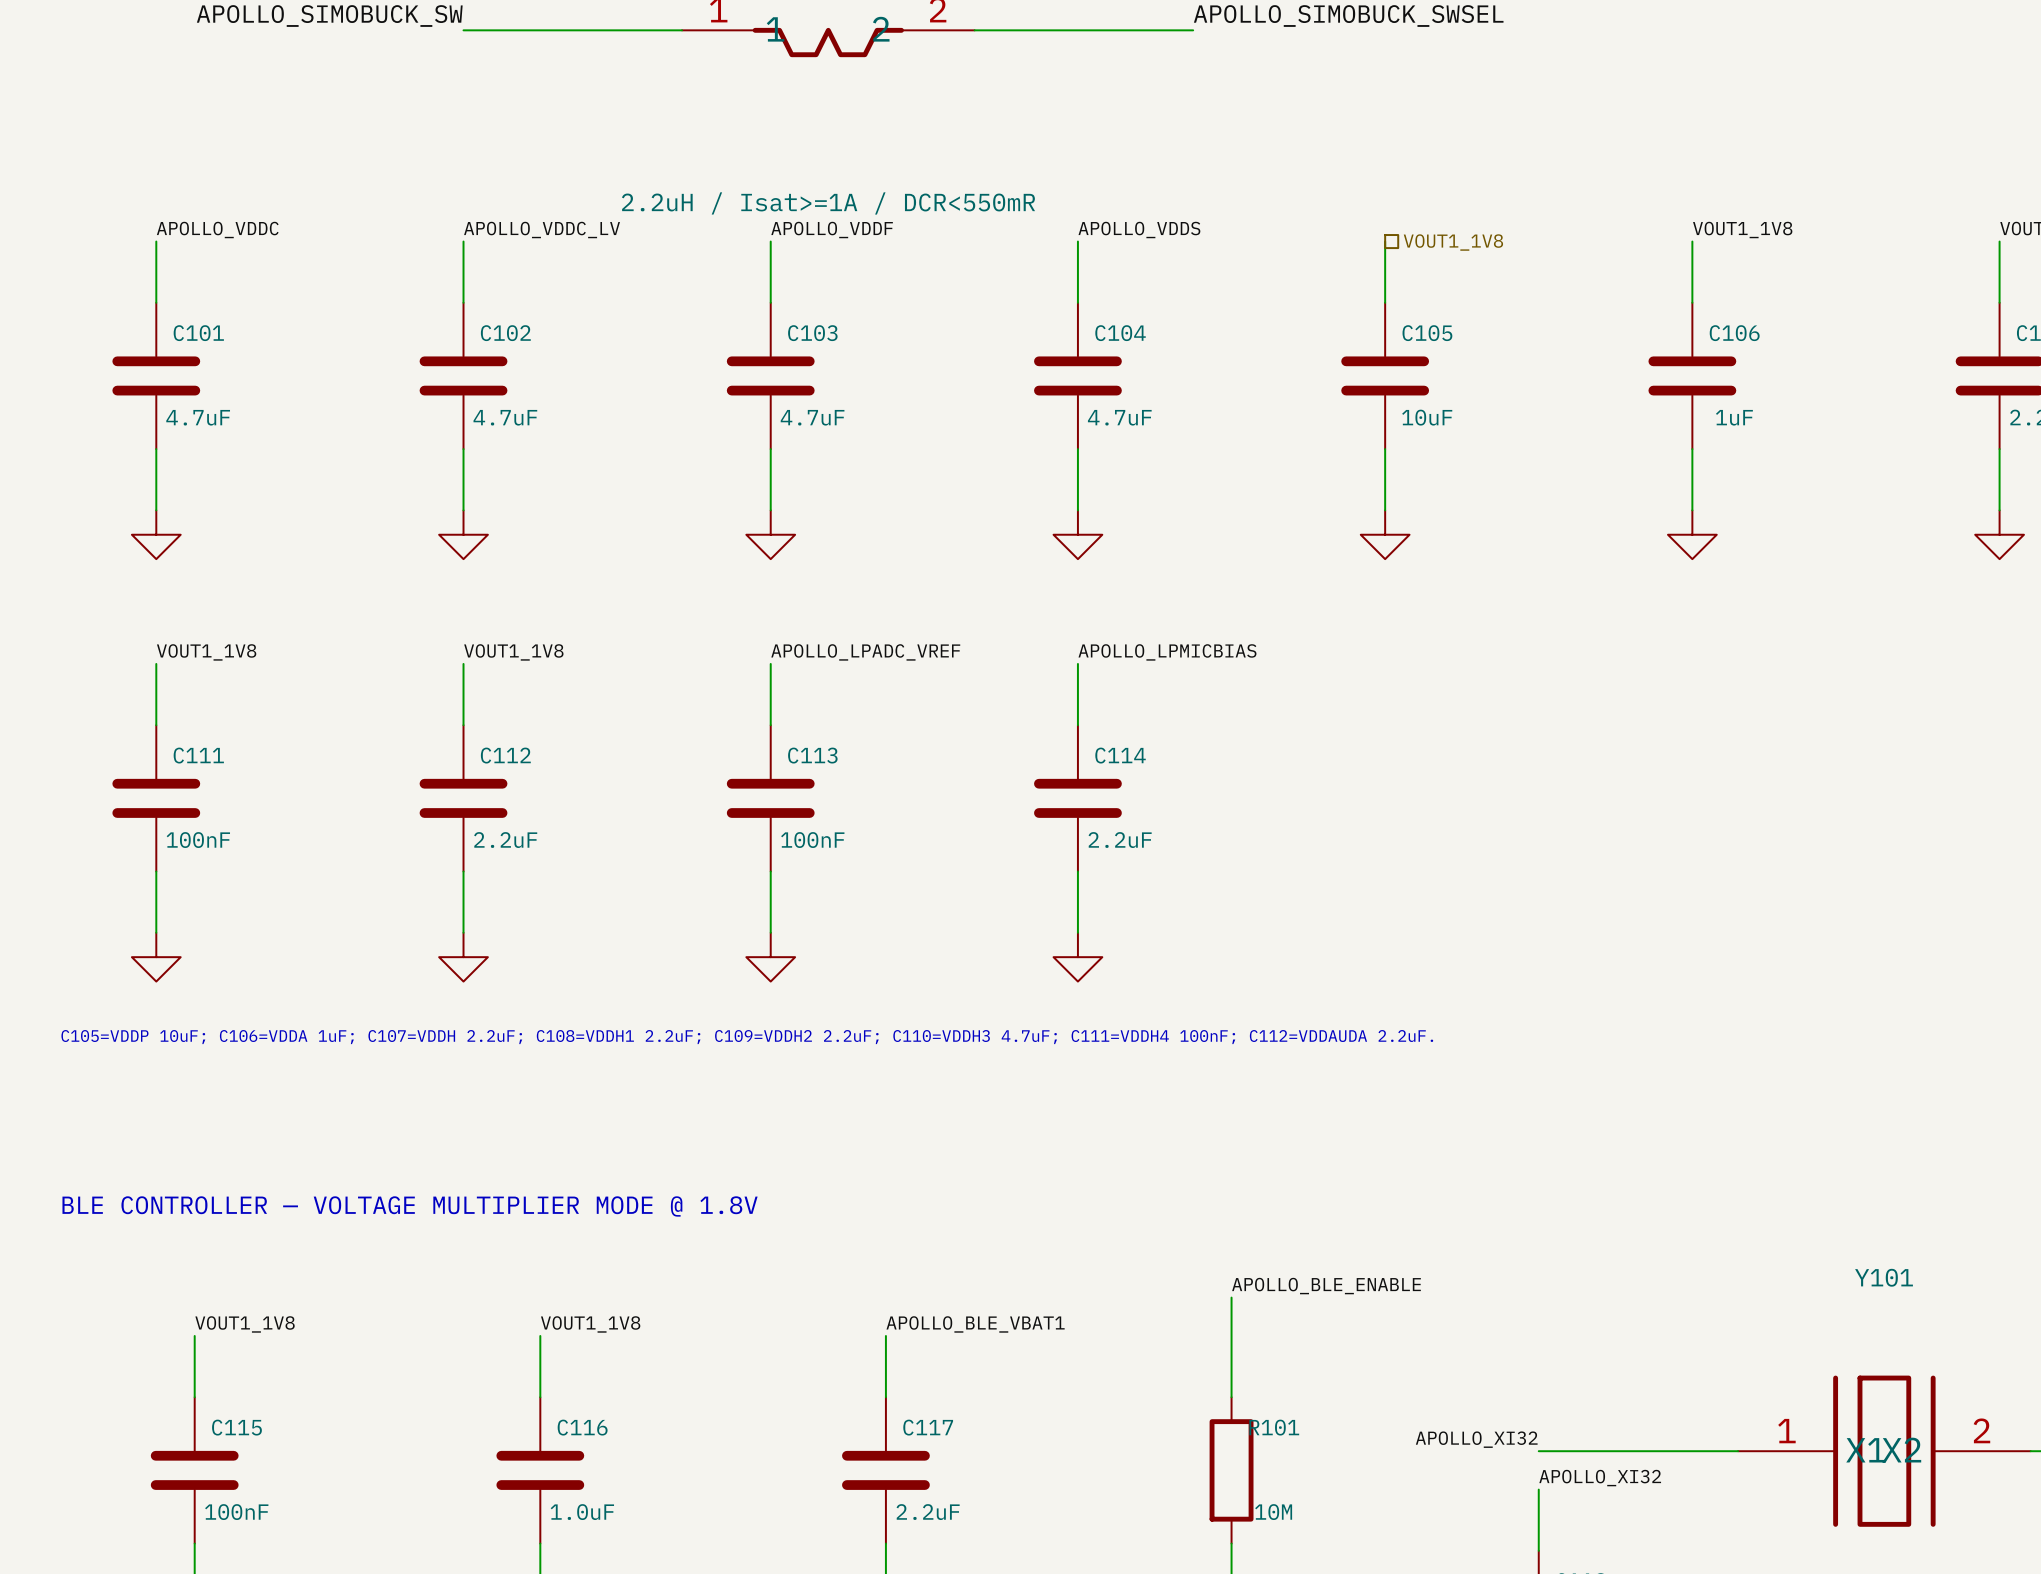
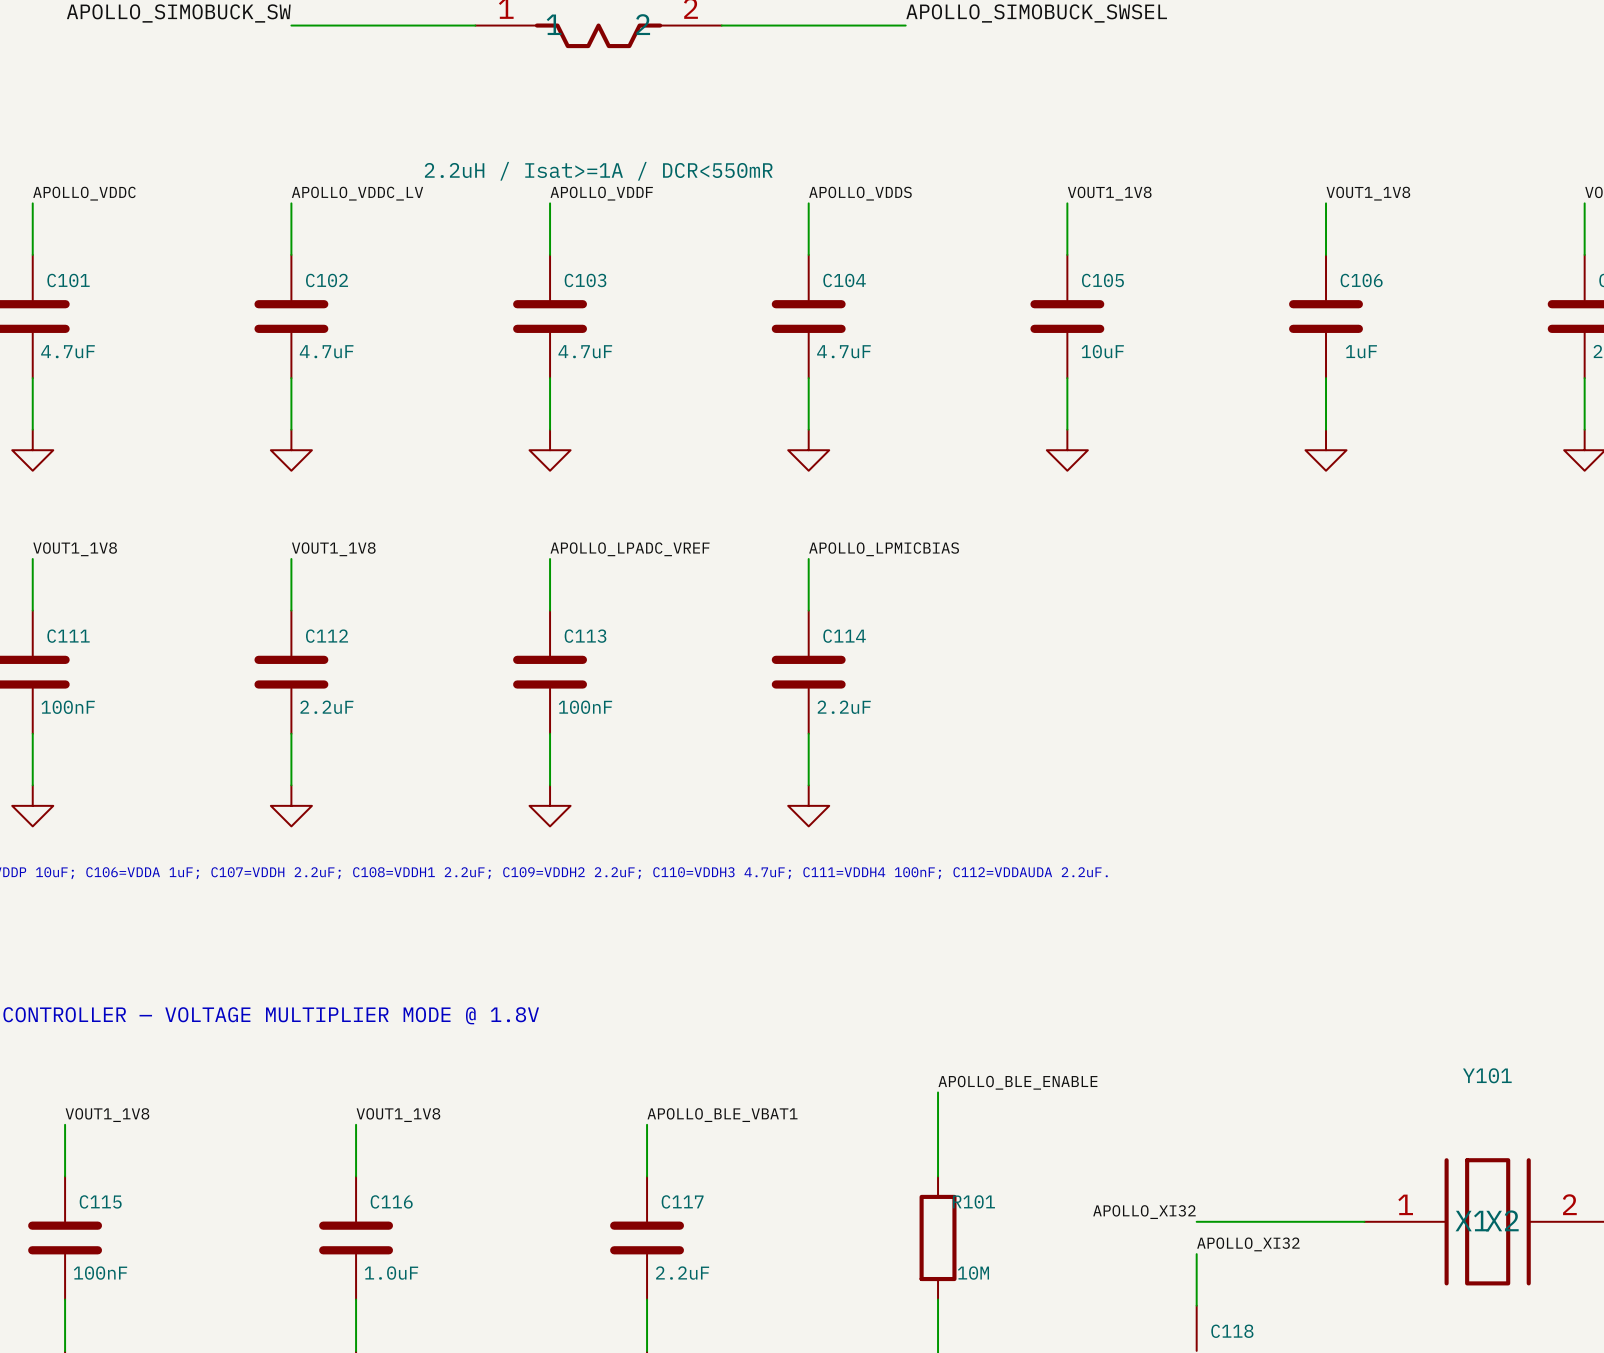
label: none -> VOUT1_1V8 (1109, 193)
hierarchical label: VOUT1_1V8 (1453, 242) -> none

